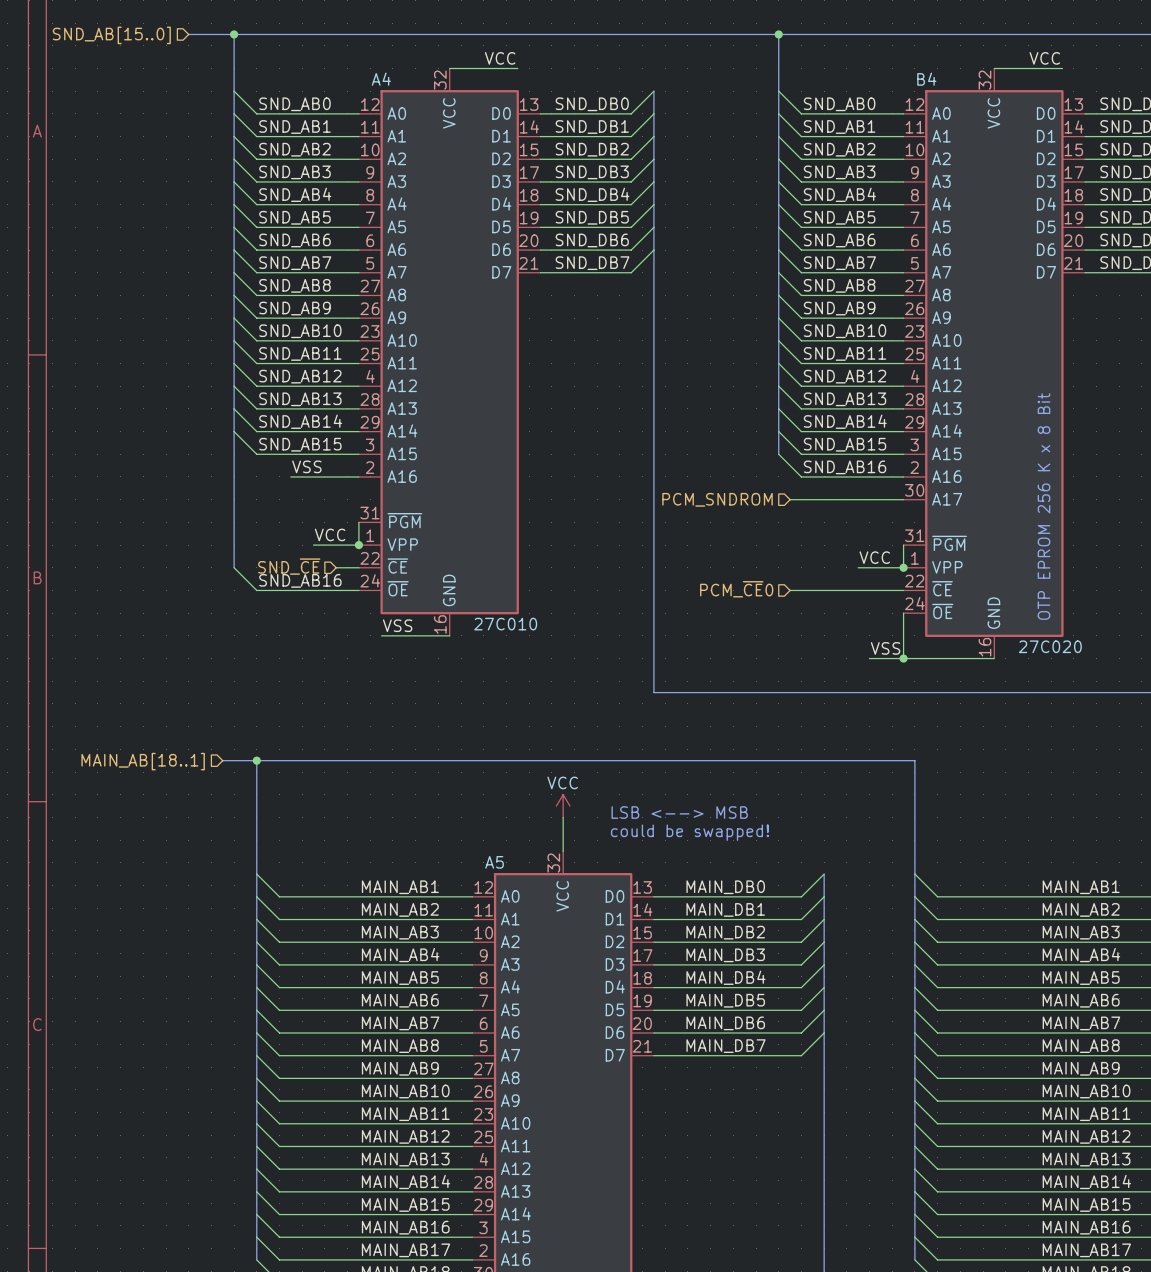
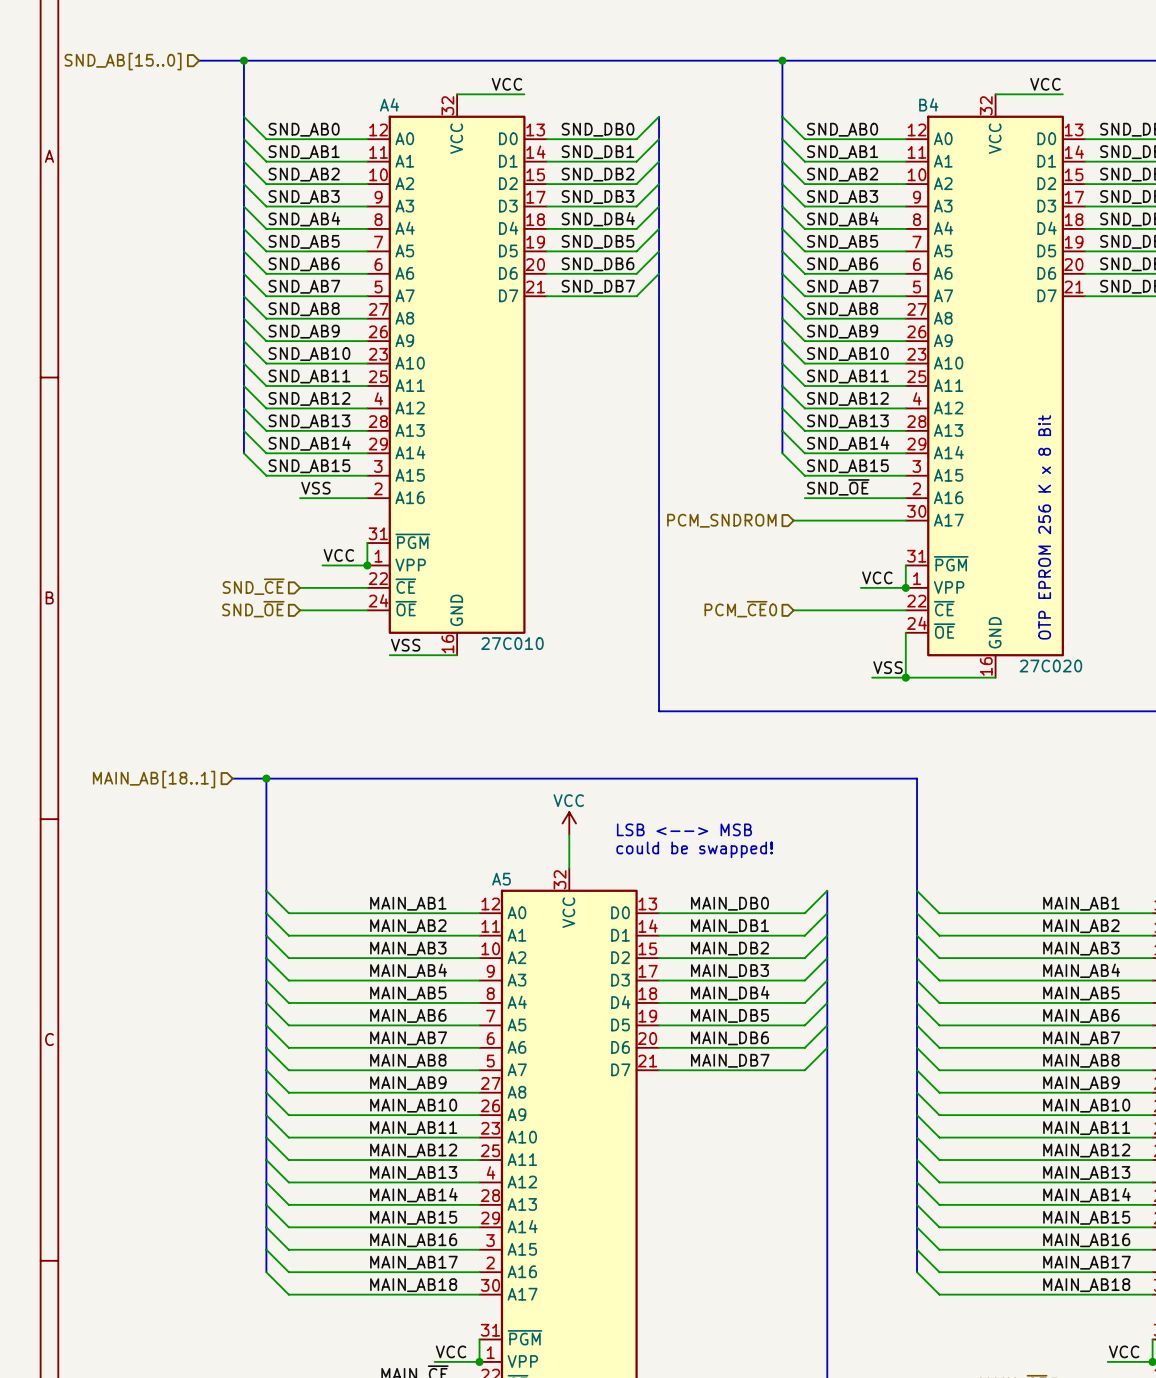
bus: (234, 431) (234, 567) -> none
bus: (778, 431) (778, 454) -> none
wire: (778, 454) (801, 476) -> none
label: SND_AB16 (845, 467) -> SND_~{OE} (838, 487)
hierarchical label position: SND_~{CE} (289, 566) -> SND_~{CE} (253, 586)
wire: (234, 567) (256, 590) (290, 590) -> none
wire: none -> (300, 587) (344, 587)
label: SND_AB16 (300, 580) -> none
hierarchical label: none -> SND_~{OE} (253, 609)

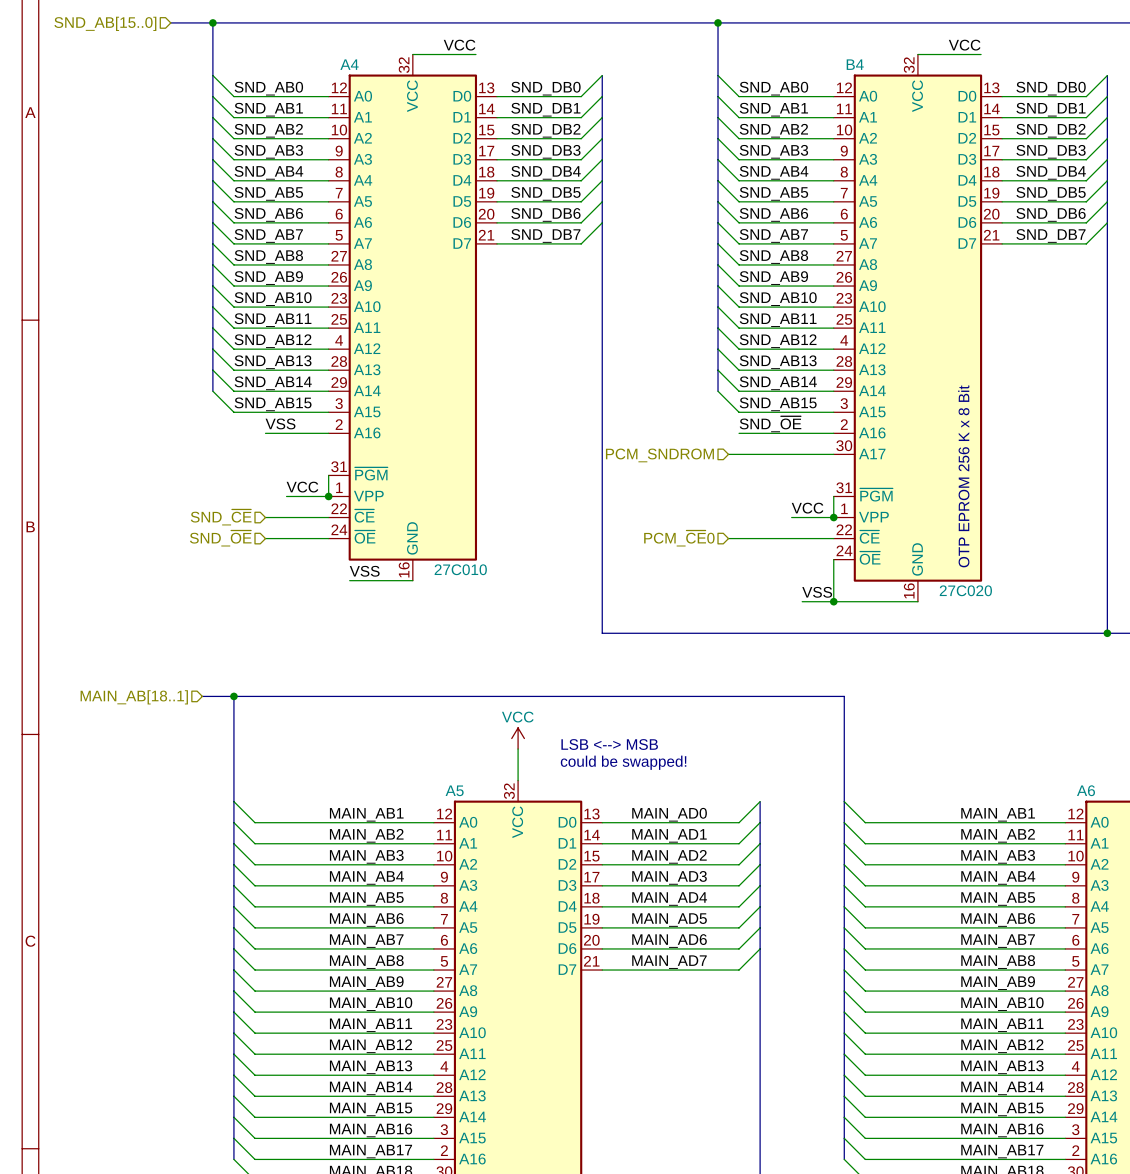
label: MAIN_DB0 (729, 903) -> MAIN_AD0 (669, 814)
label: MAIN_DB1 (729, 926) -> MAIN_AD1 (669, 835)
label: MAIN_DB2 (729, 948) -> MAIN_AD2 (669, 856)
label: MAIN_DB3 (729, 971) -> MAIN_AD3 (669, 877)
label: MAIN_DB4 (730, 993) -> MAIN_AD4 (669, 899)
label: MAIN_DB5 (729, 1015) -> MAIN_AD5 (669, 920)
label: MAIN_DB6 (729, 1038) -> MAIN_AD6 (669, 941)
label: MAIN_DB7 (730, 1060) -> MAIN_AD7 (669, 962)

